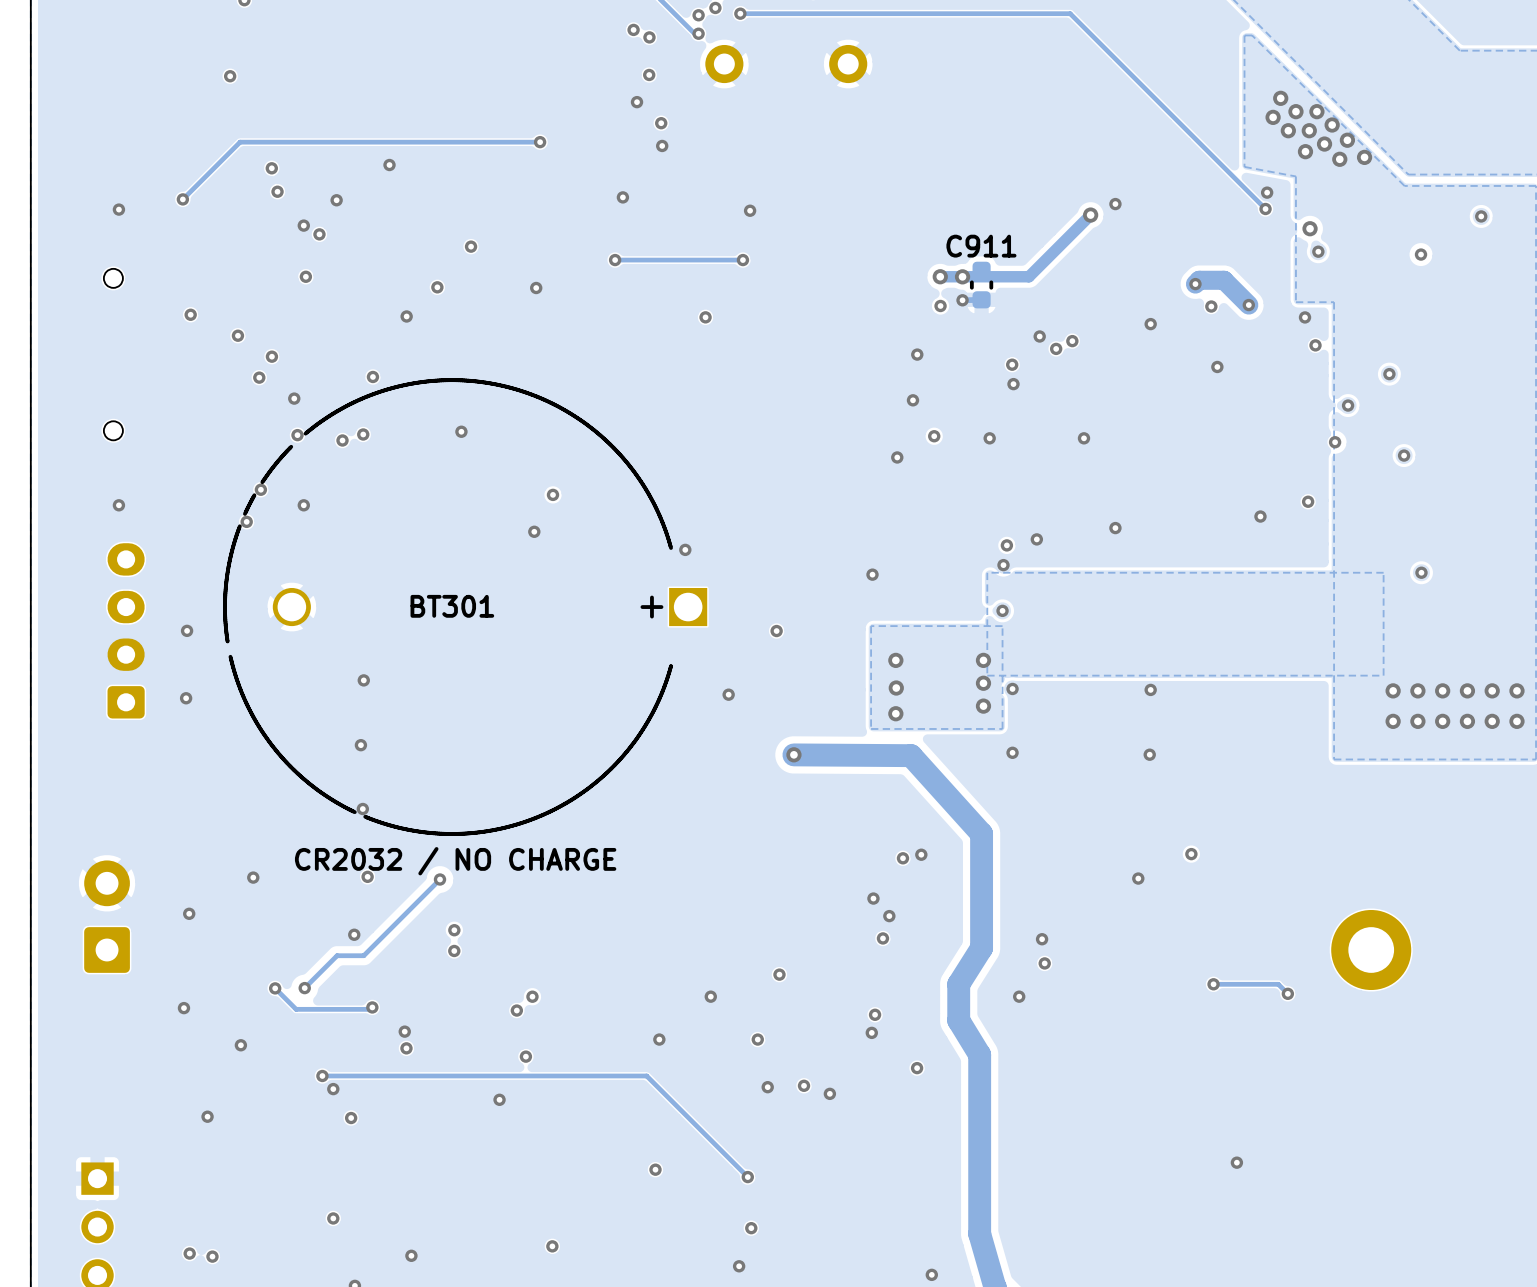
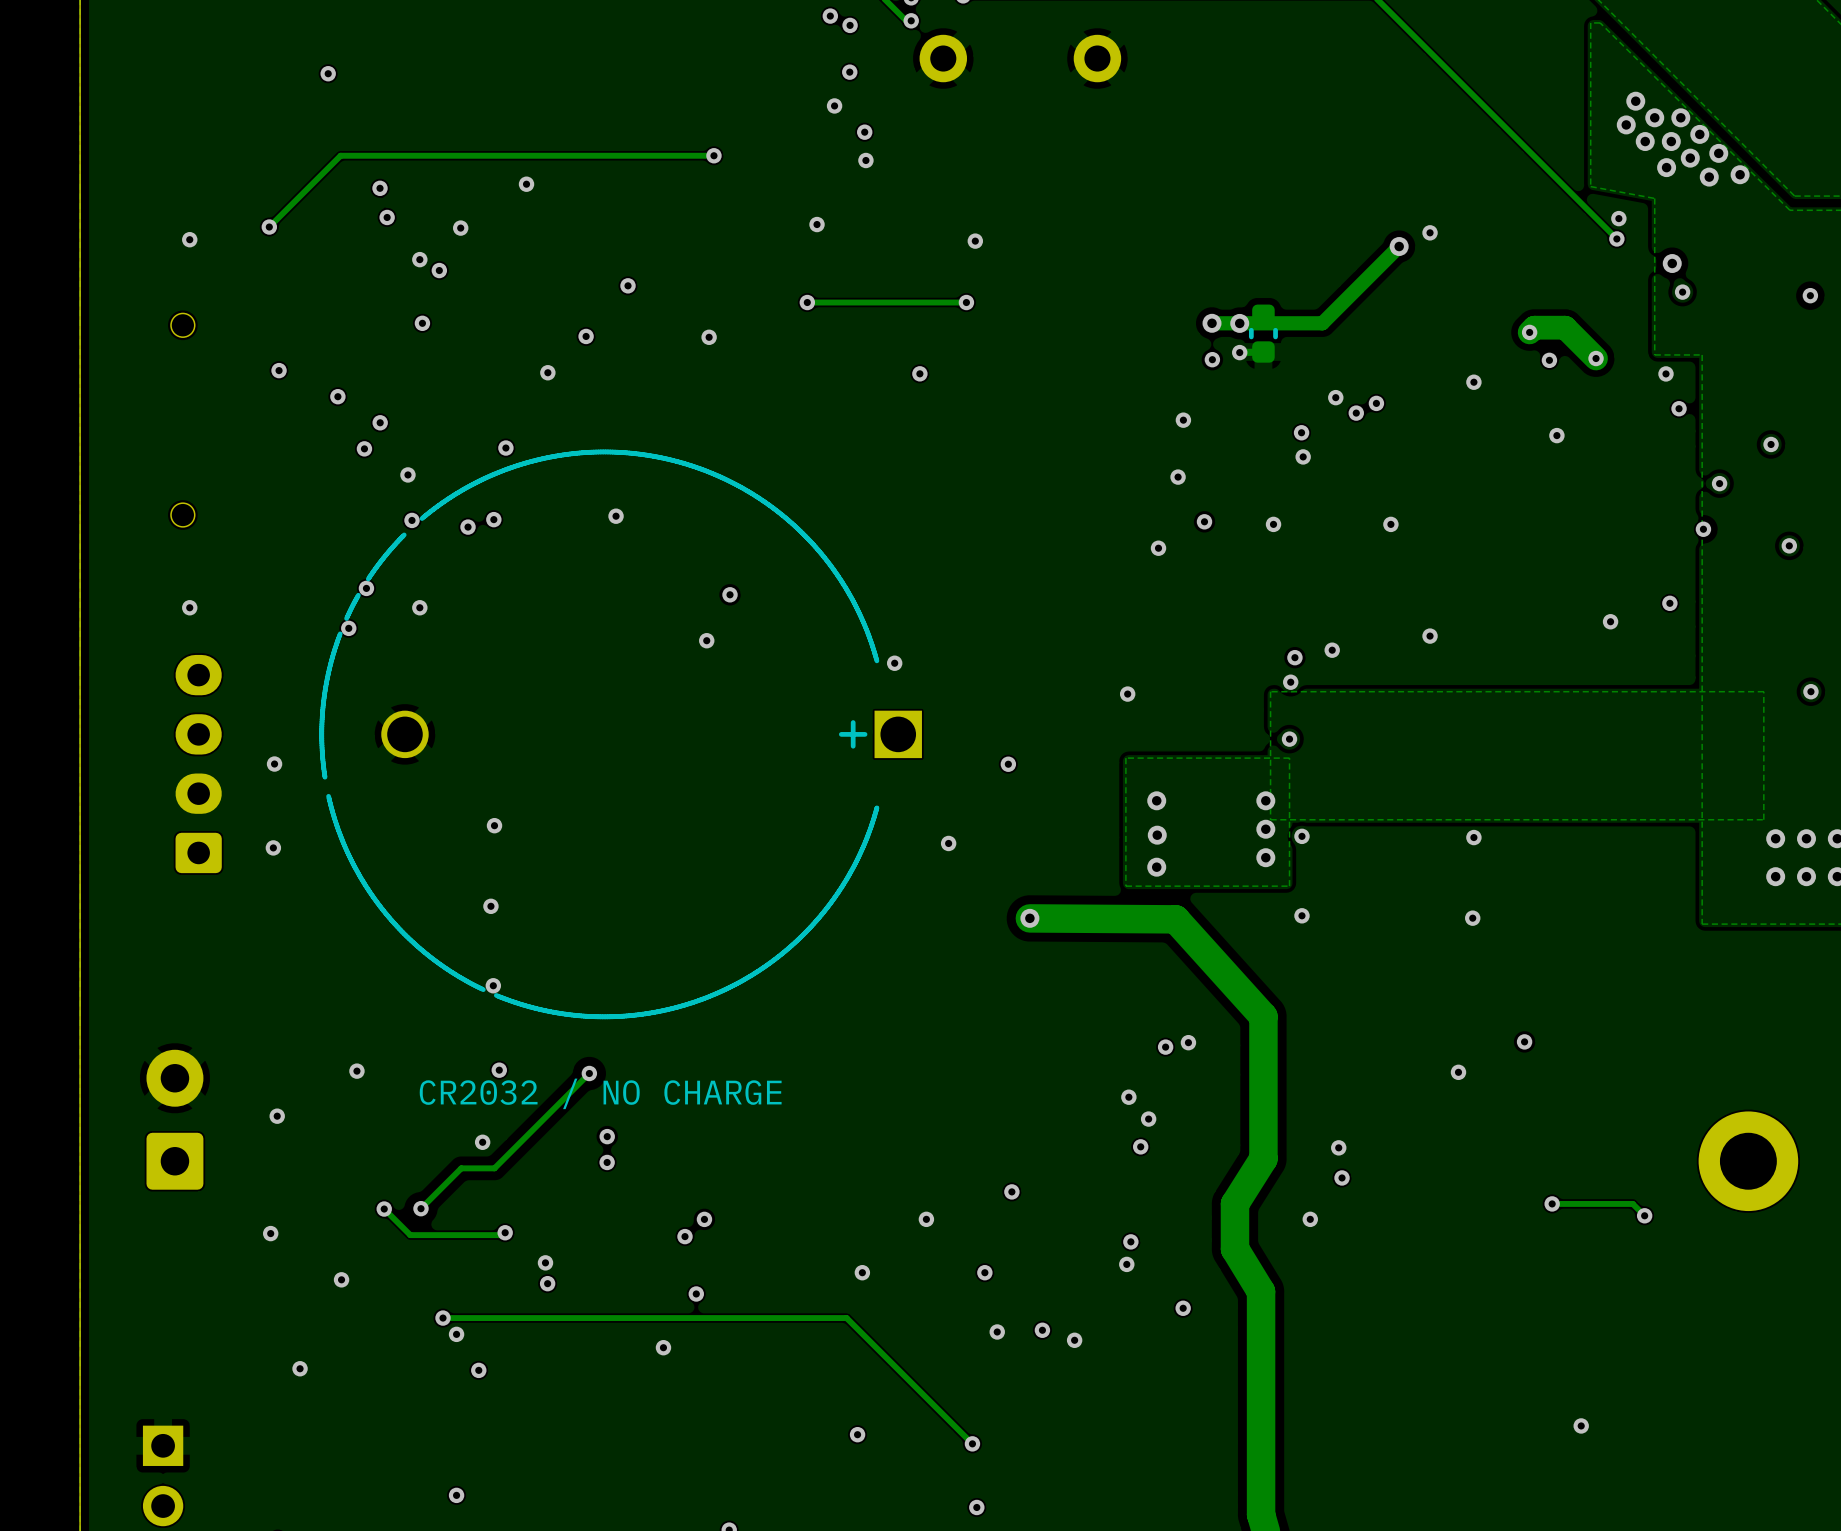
C911 name: C911 (981, 246) -> none
BT301 name: BT301 (452, 606) -> none
text position: CR2032 / NO CHARGE (455, 861) -> CR2032 / NO CHARGE (600, 1093)

